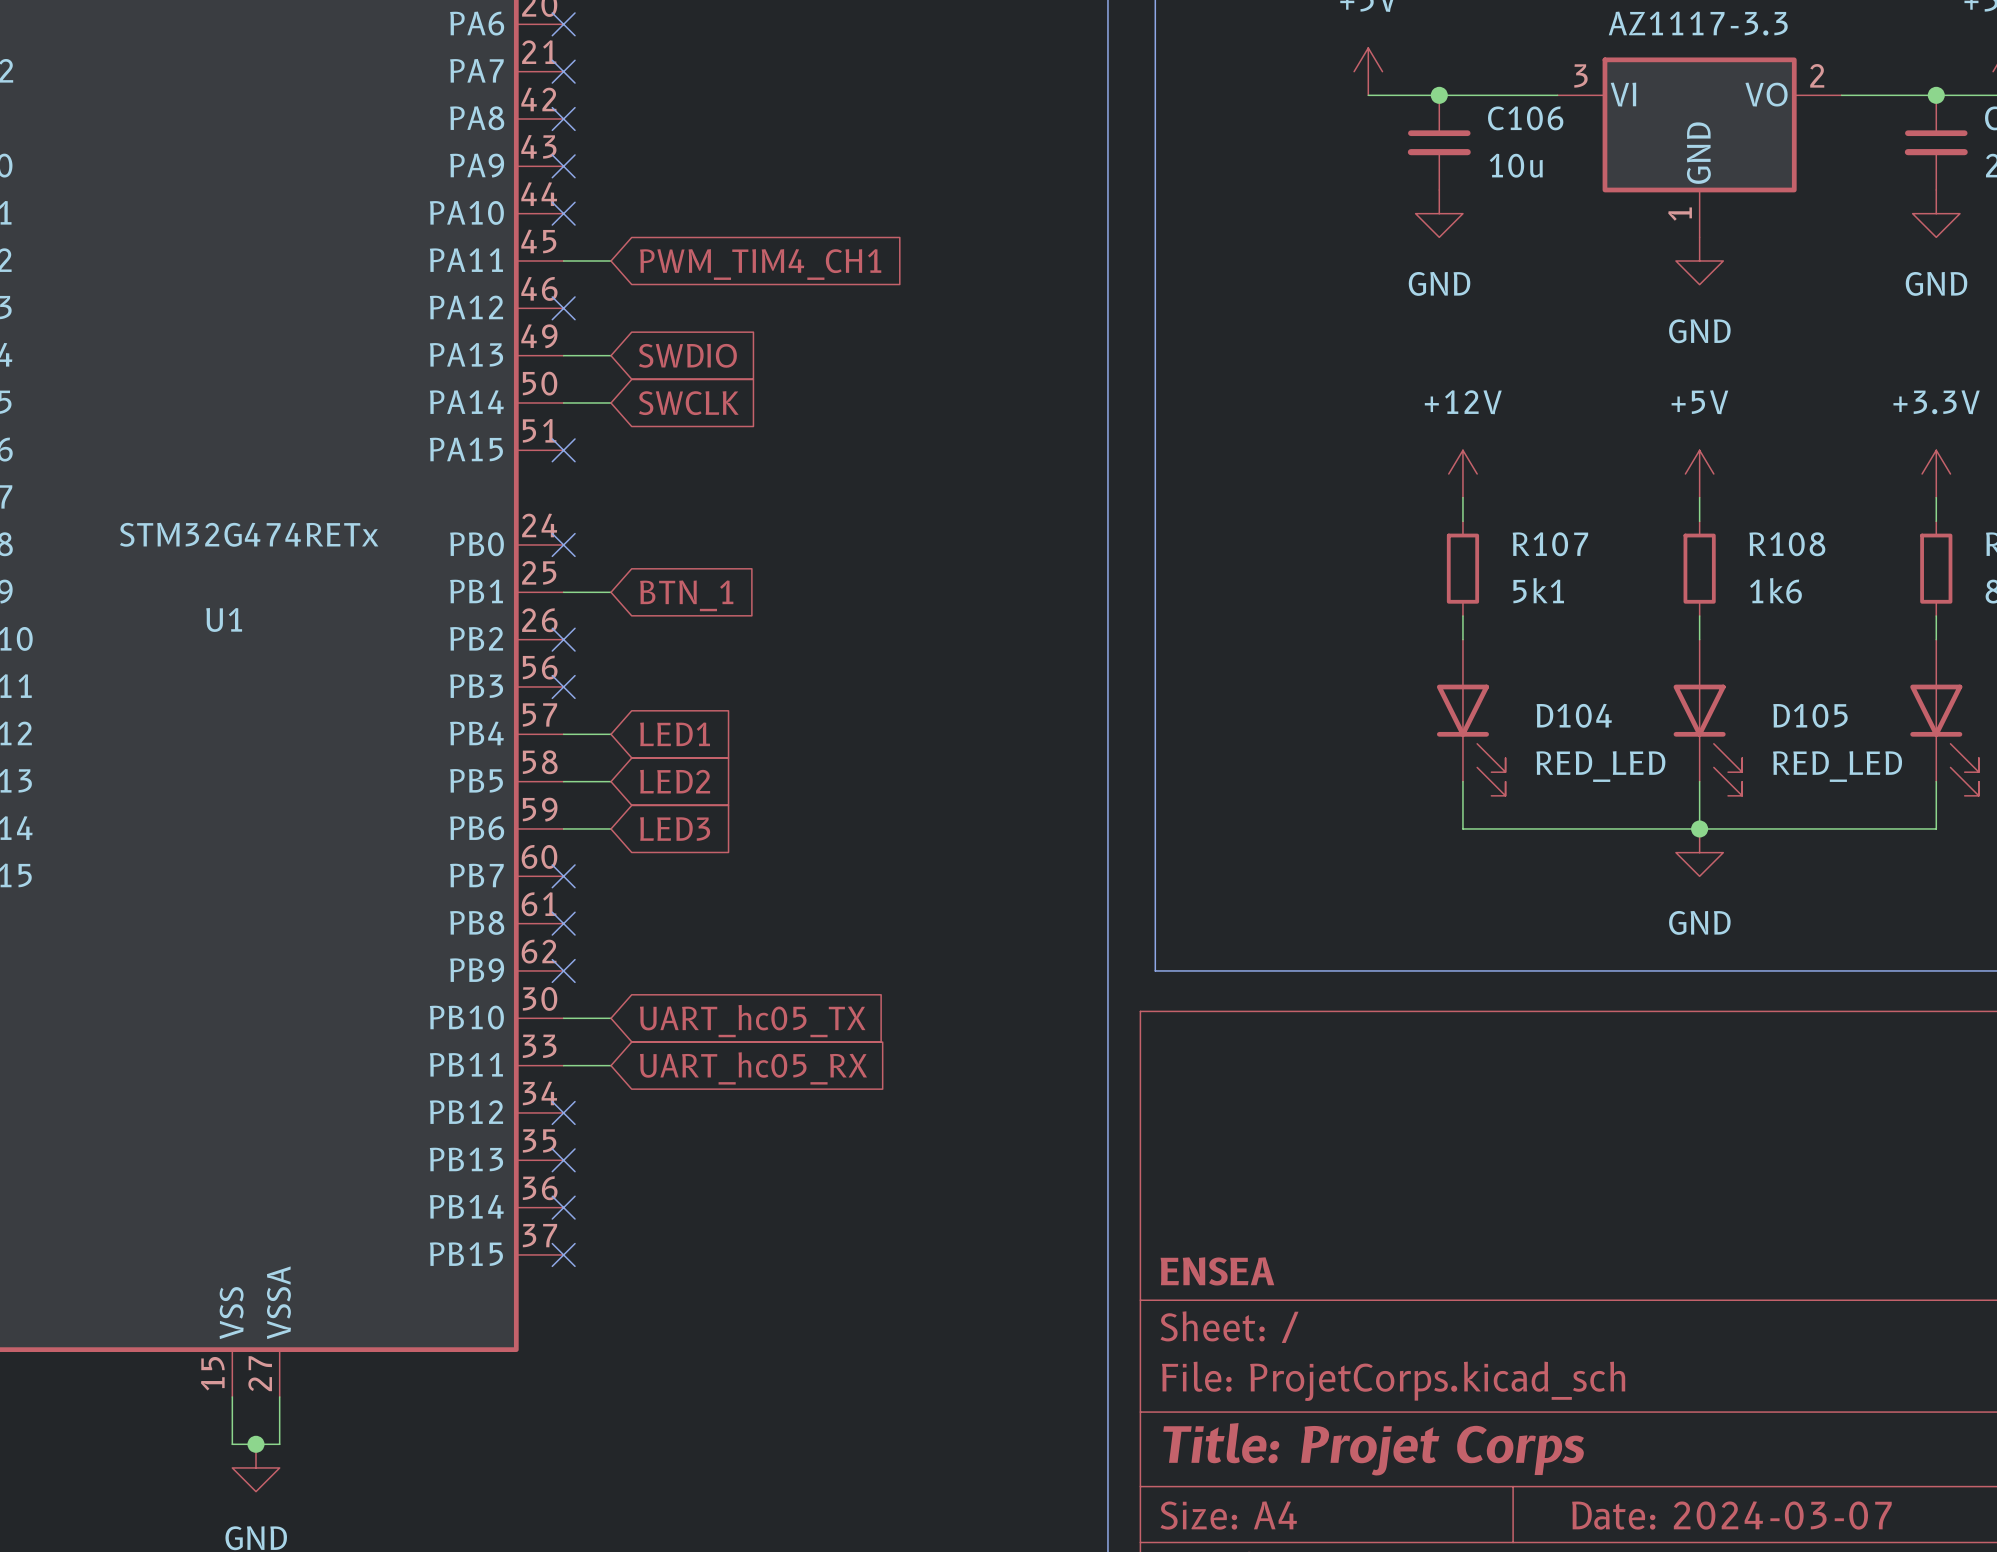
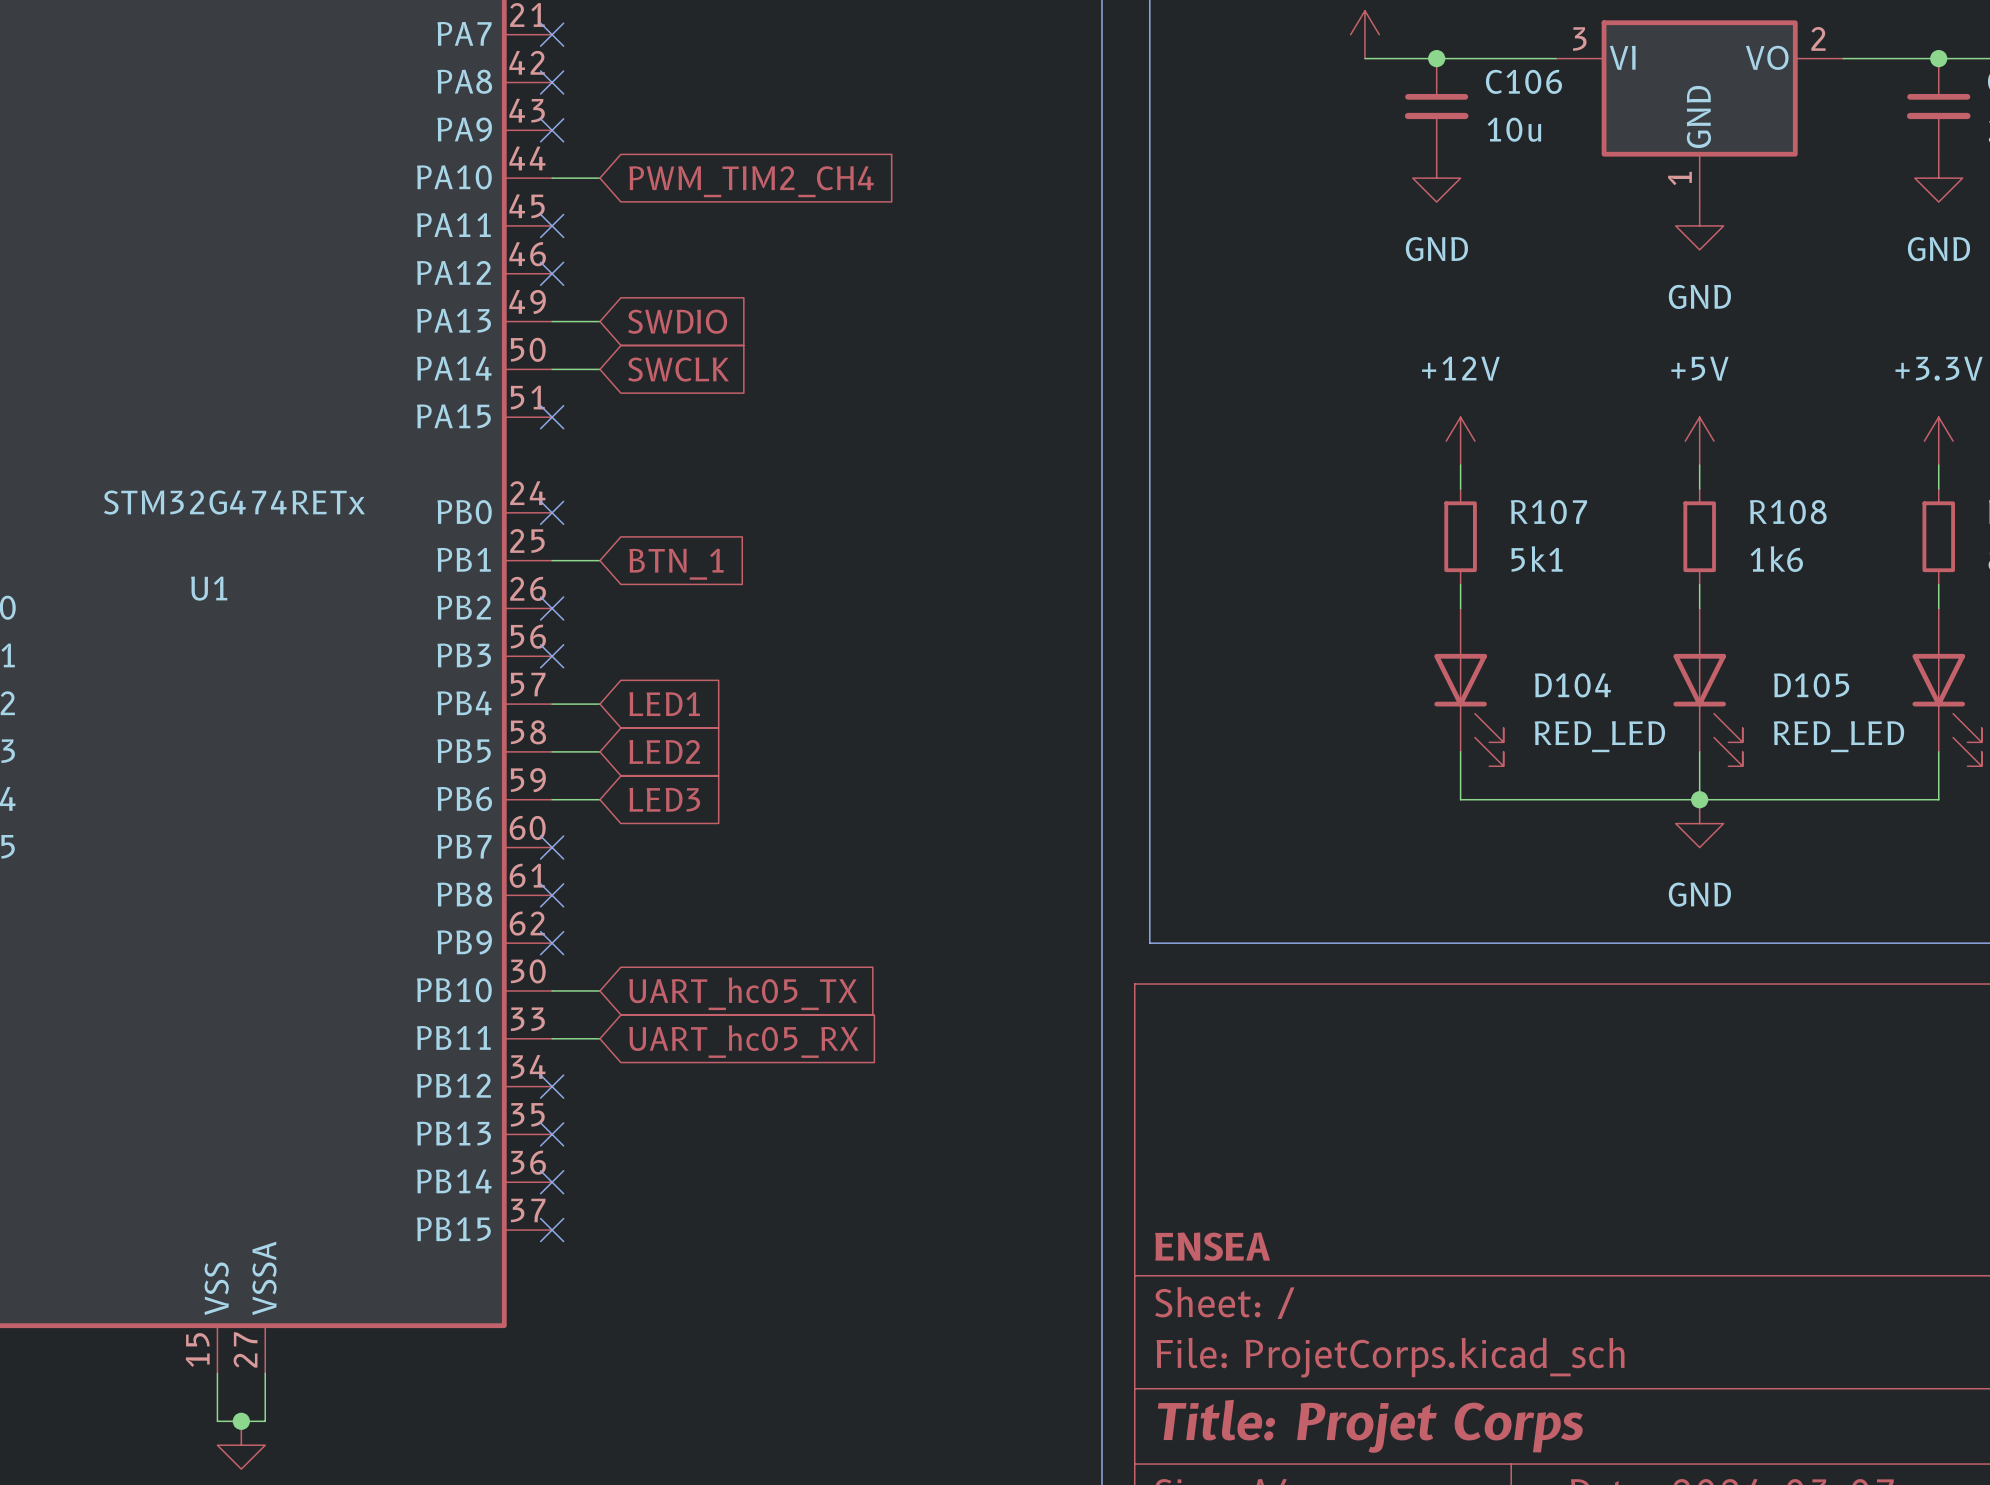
no-connect mark position: (563, 213) -> (552, 225)
wire: (563, 260) (610, 260) -> (552, 178) (599, 178)
global label: PWM_TIM4_CH1 (760, 264) -> PWM_TIM2_CH4 (751, 181)

